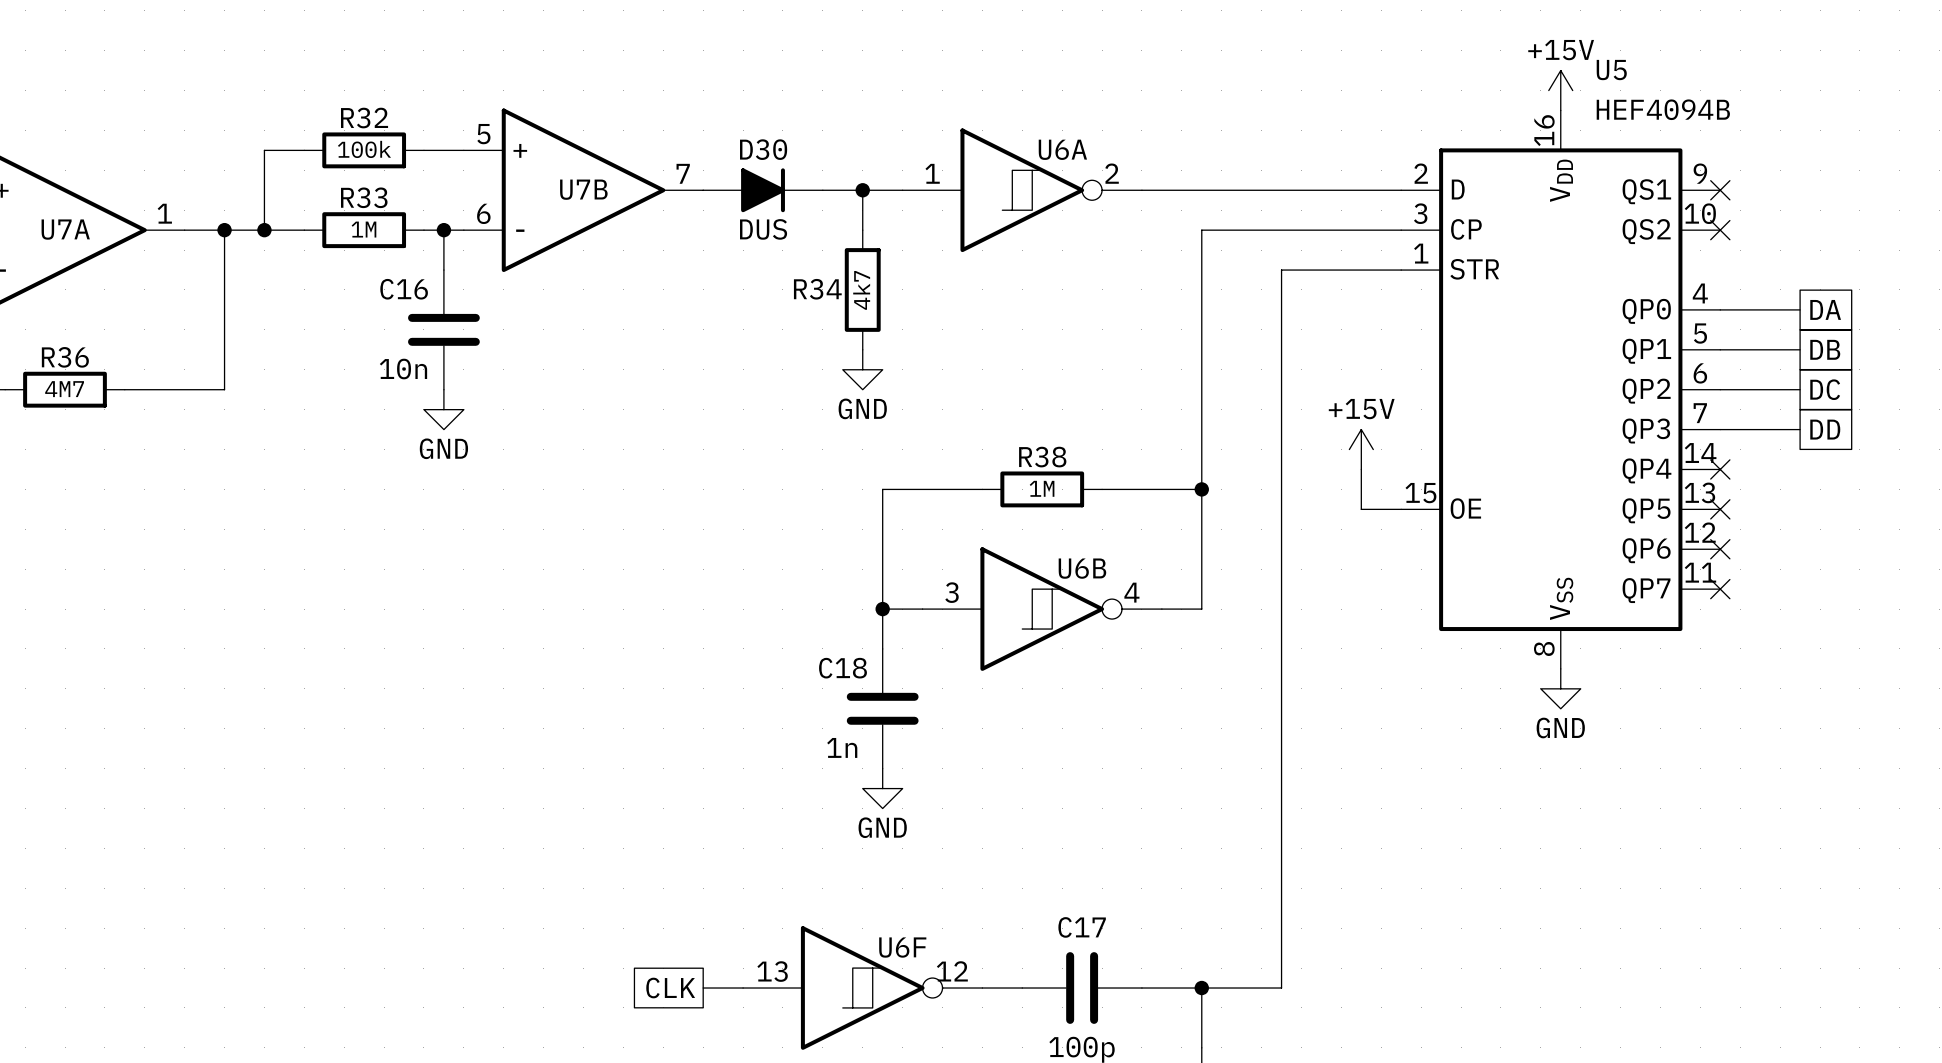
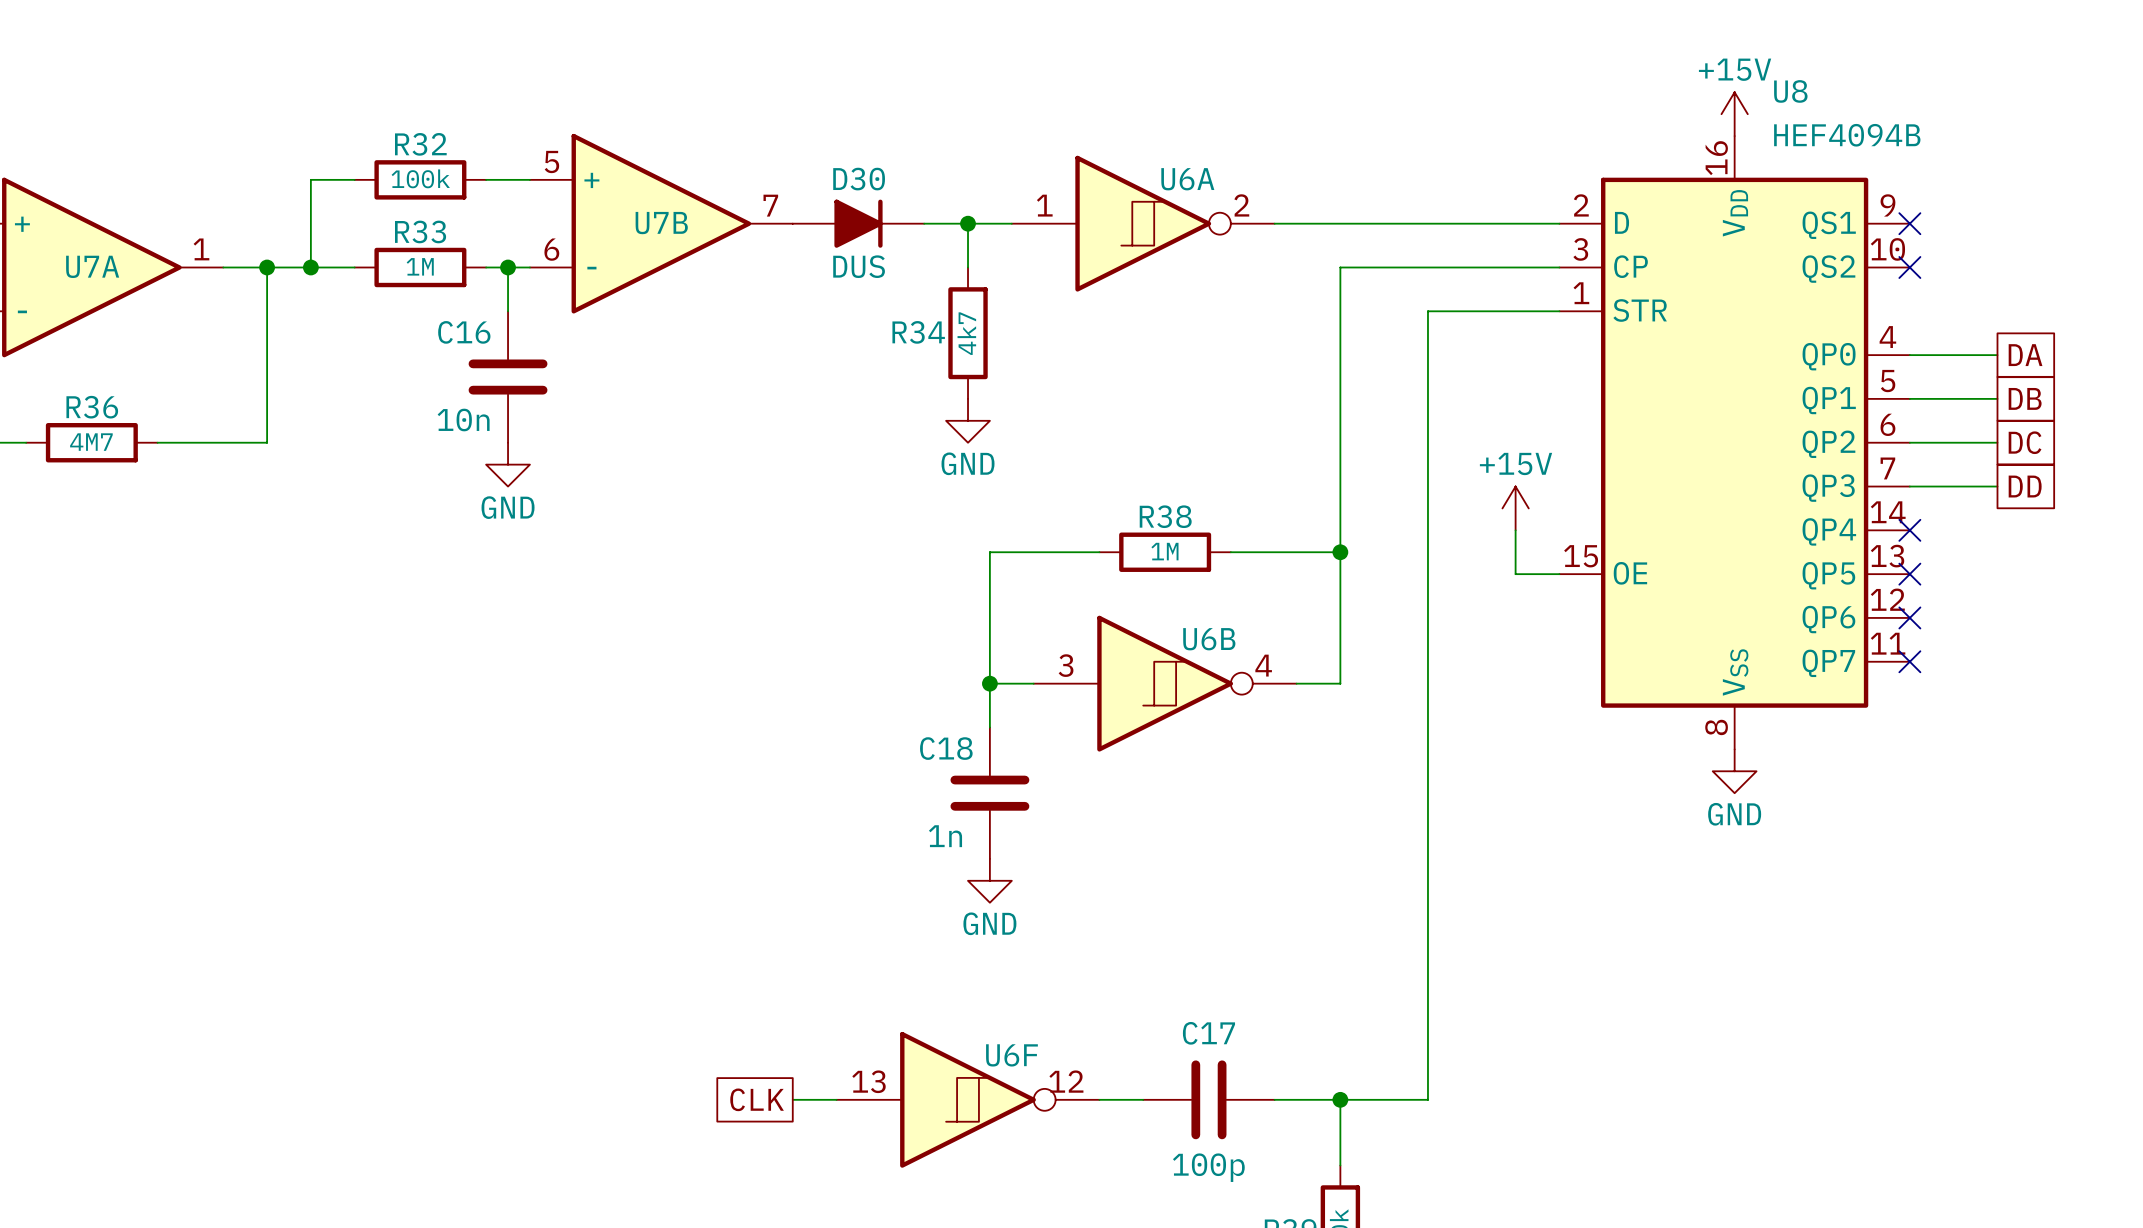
U5 name: U5 (1611, 70) -> U8 (1790, 91)

